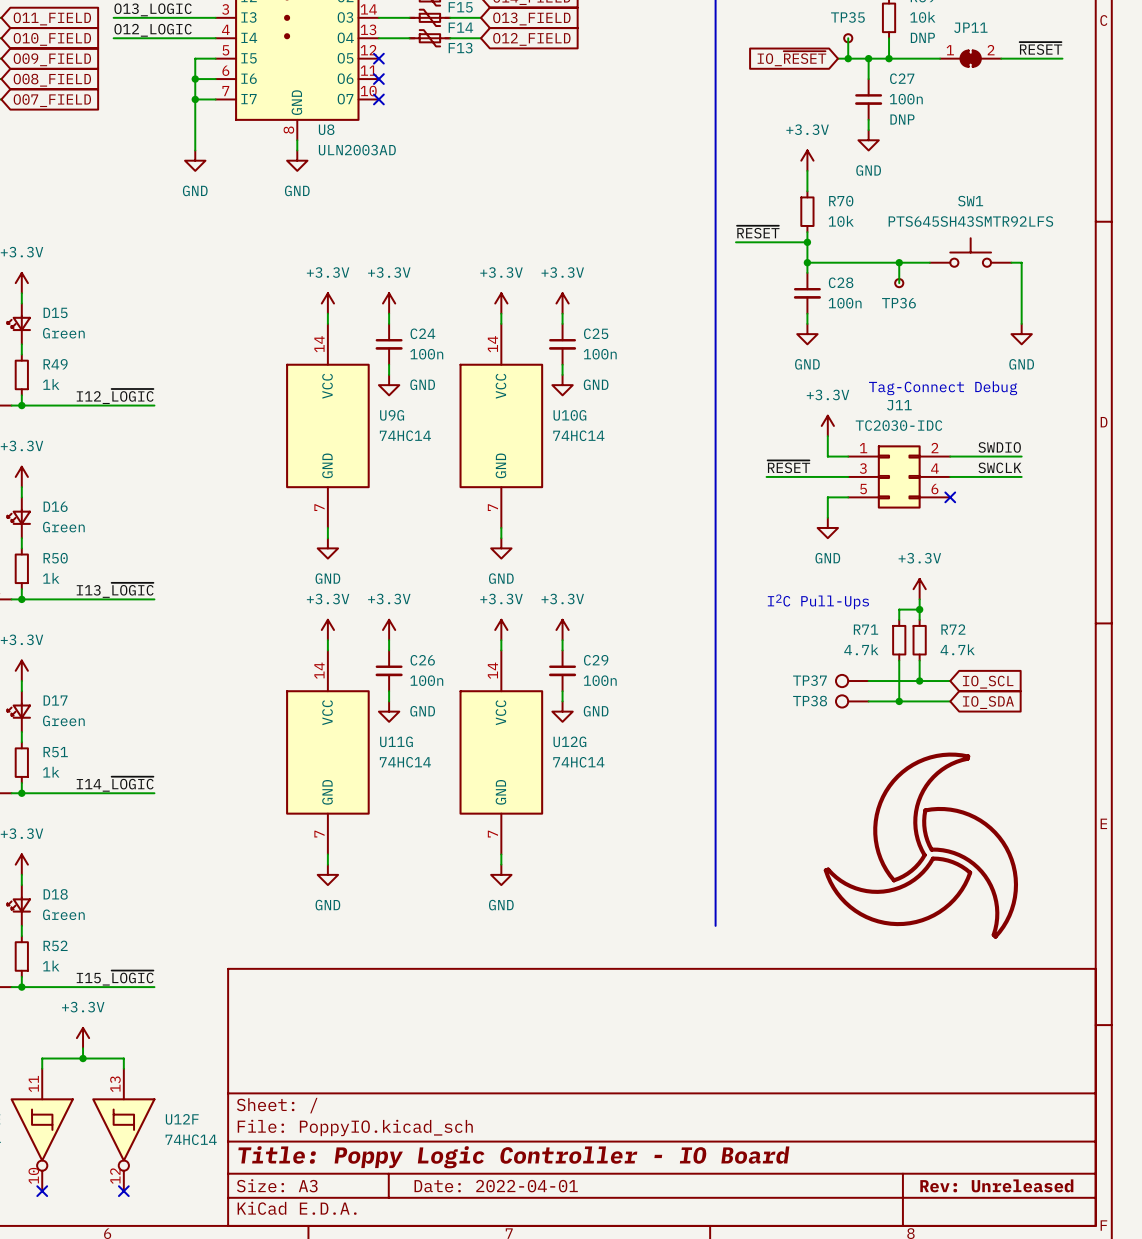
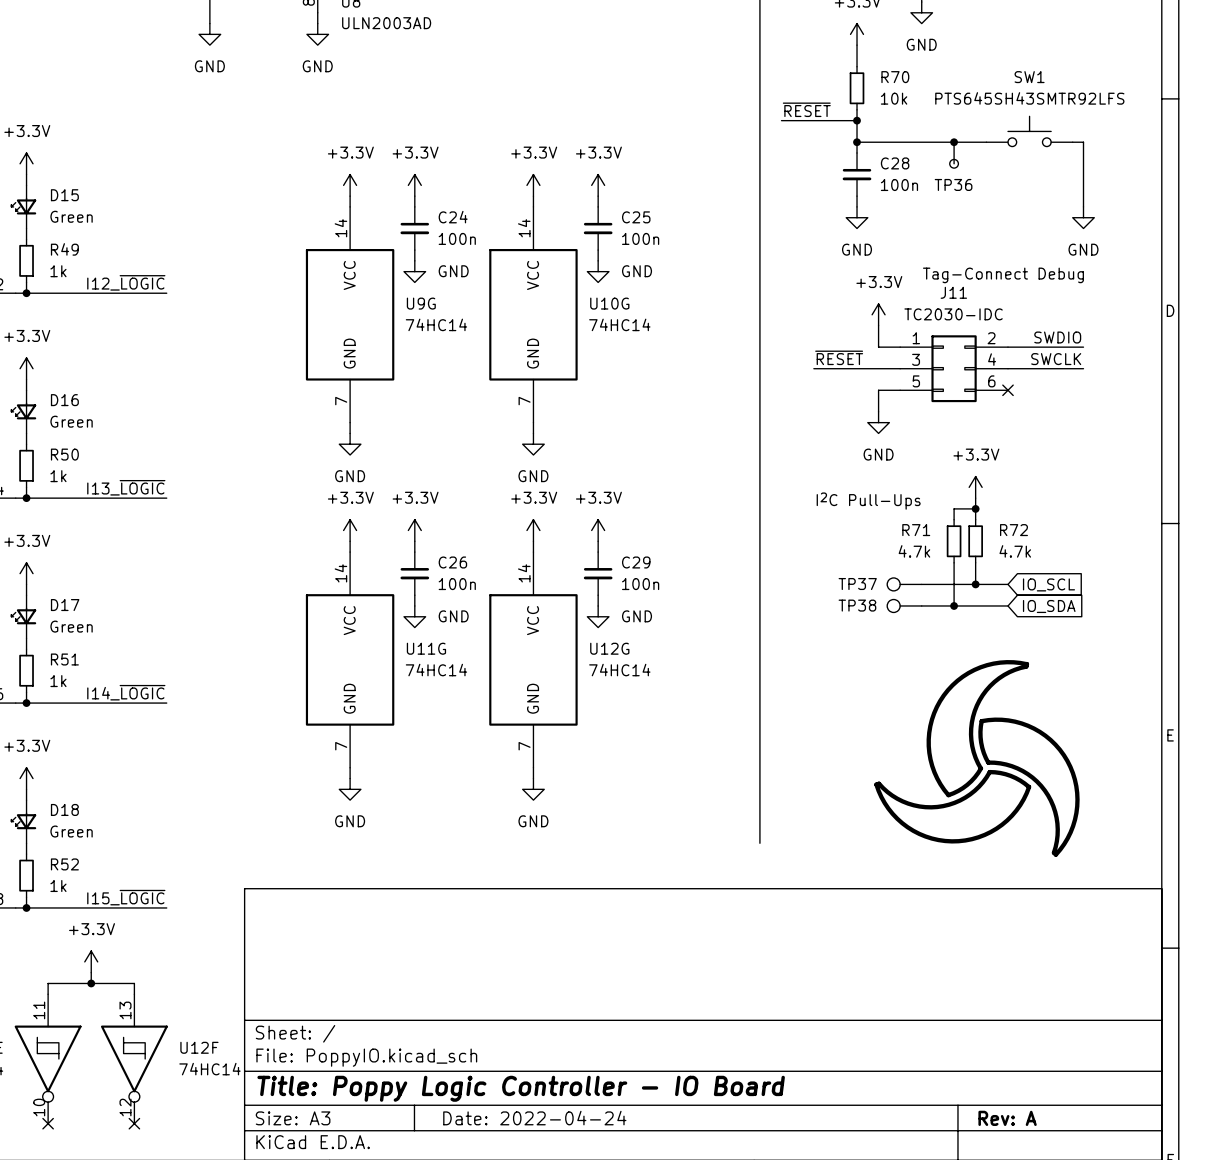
title block: Rev: Unreleased (996, 1185) -> Rev: A (1007, 1118)
title block: Date: 2022-04-01 (496, 1186) -> Date: 2022-04-24 (534, 1118)

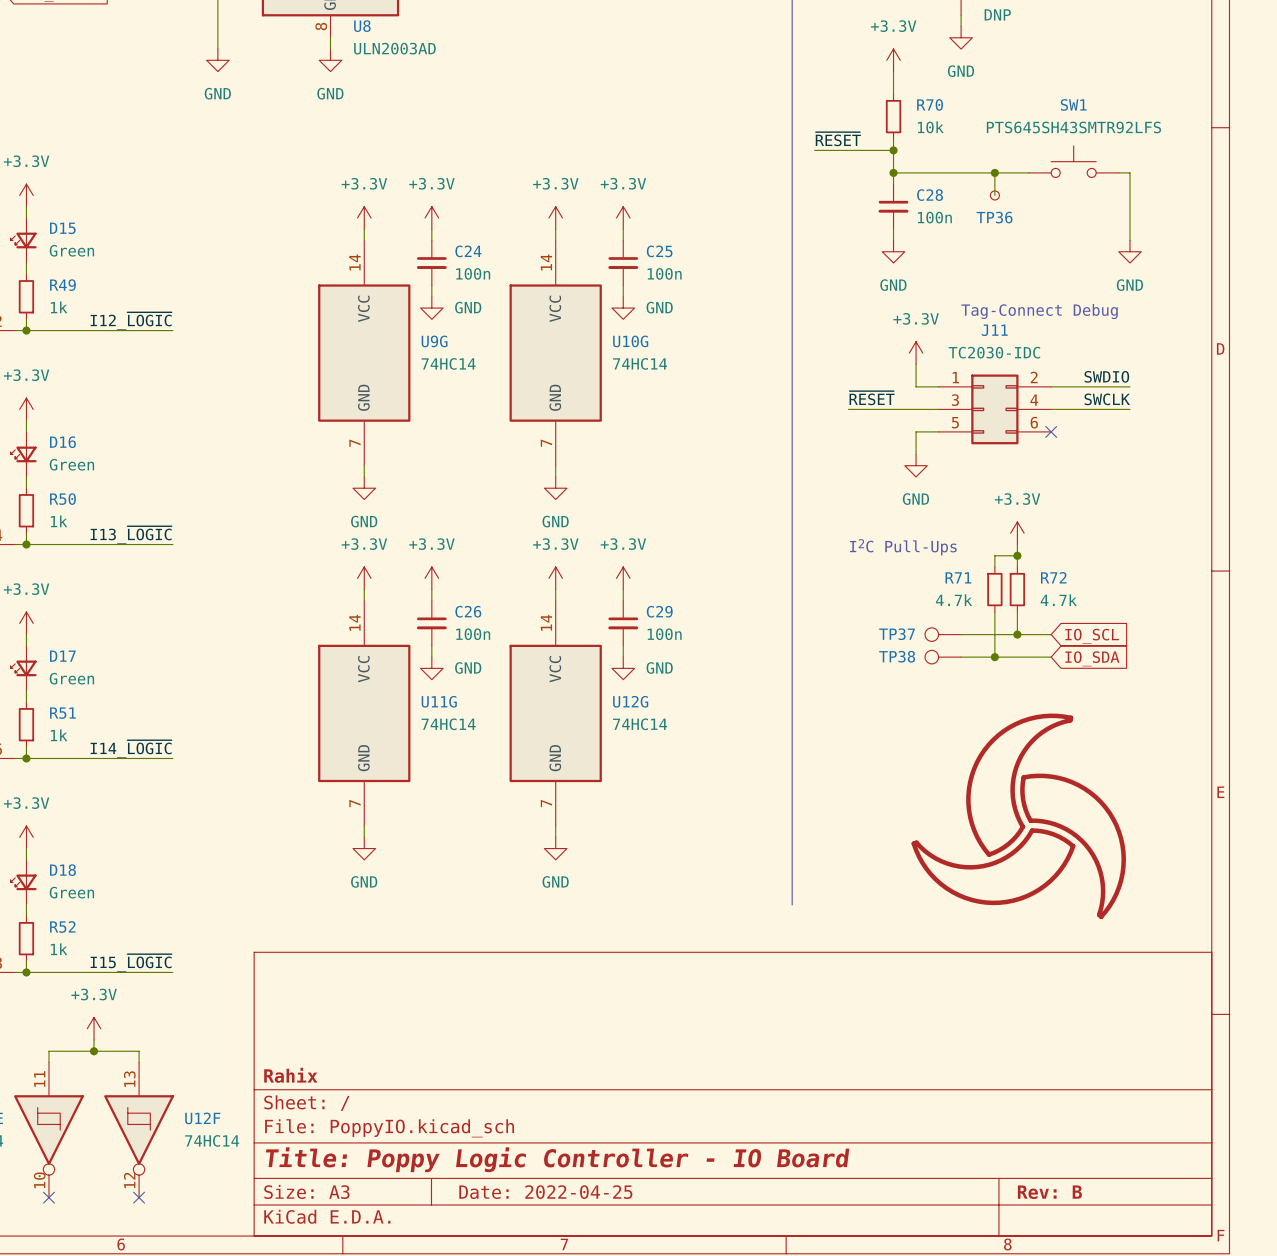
title block: none -> Rahix (290, 1075)
title block: Date: 2022-04-24 (534, 1118) -> Date: 2022-04-25 (545, 1192)
title block: Rev: A (1007, 1118) -> Rev: B (1049, 1192)

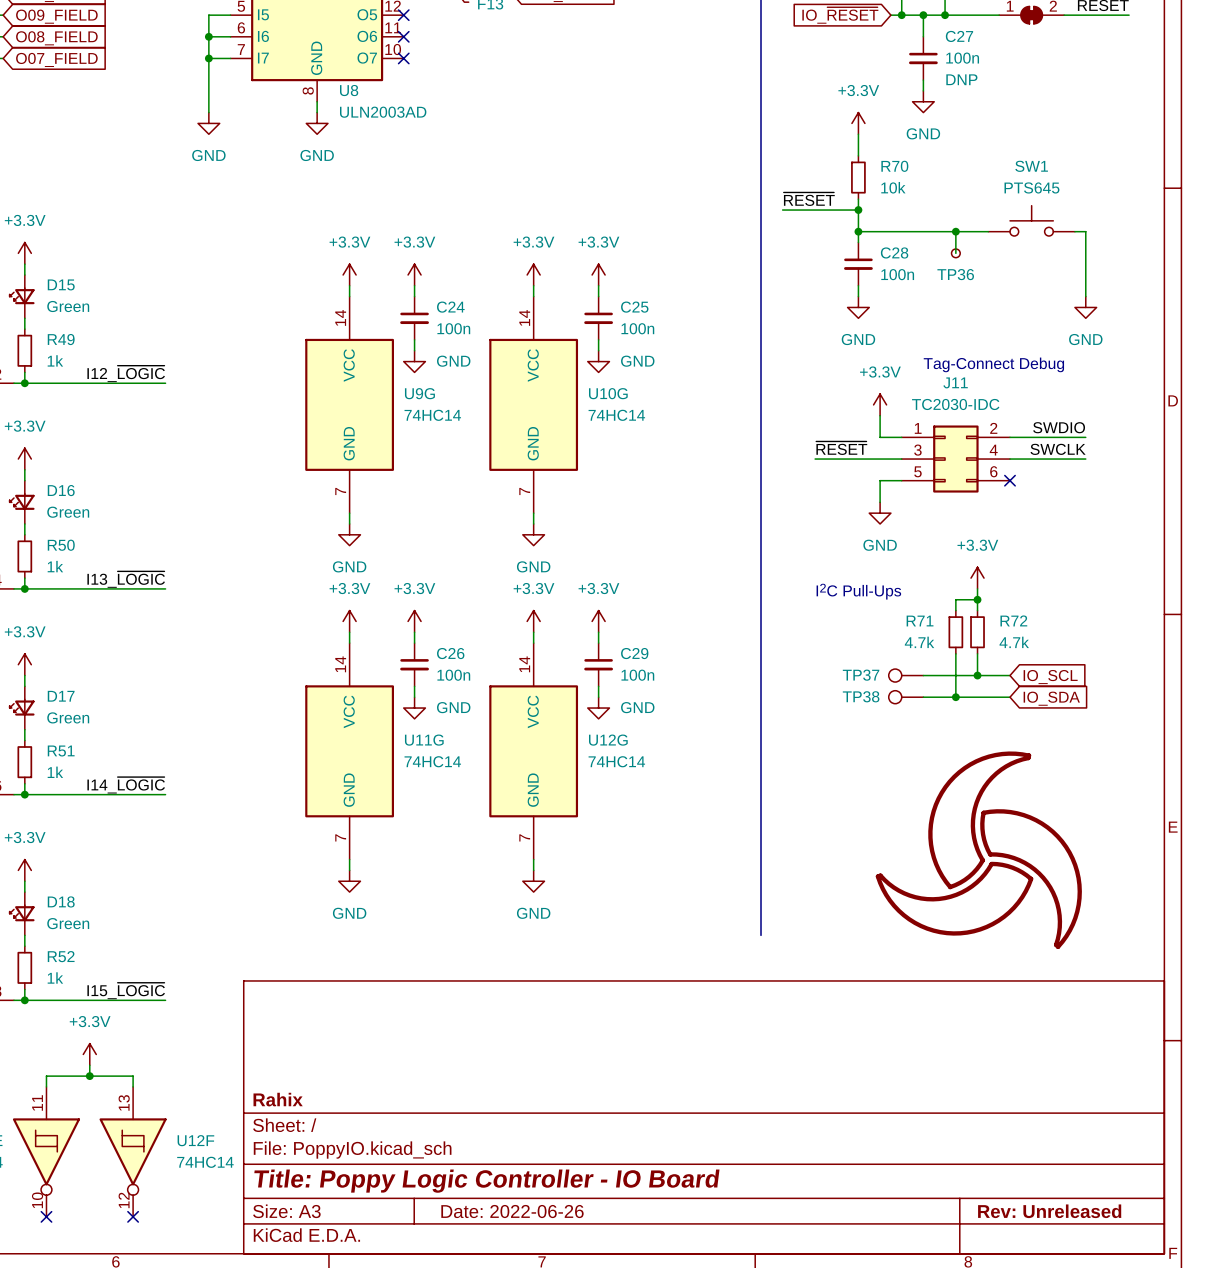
SW1 value: PTS645SH43SMTR92LFS (1073, 127) -> PTS645 (1031, 187)
title block: Date: 2022-04-25 (545, 1192) -> Date: 2022-06-26 (512, 1211)
title block: Rev: B (1049, 1192) -> Rev: Unreleased (1049, 1211)

